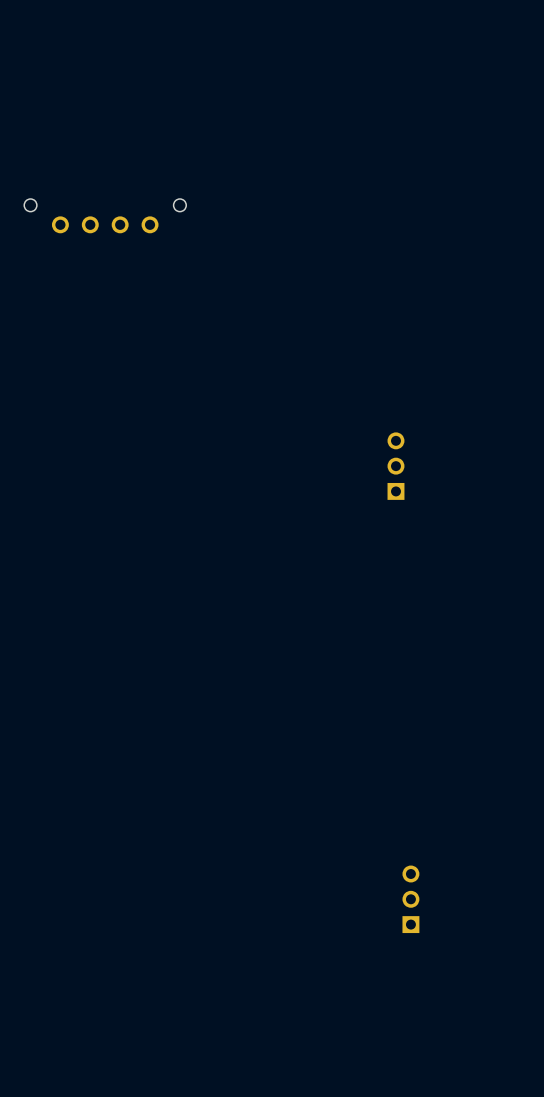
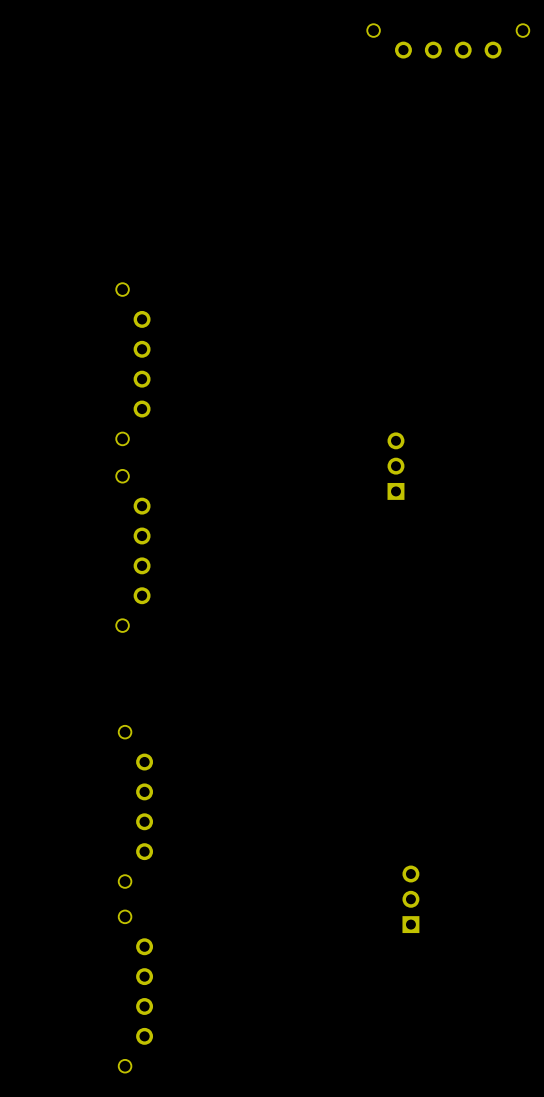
part: none -> (448, 41)
part rotation: 0° (105, 216) -> 90° counterclockwise (133, 364)
part position: (105, 216) -> (133, 364)
part: none -> (133, 550)
part: none -> (135, 806)
part: none -> (135, 991)

